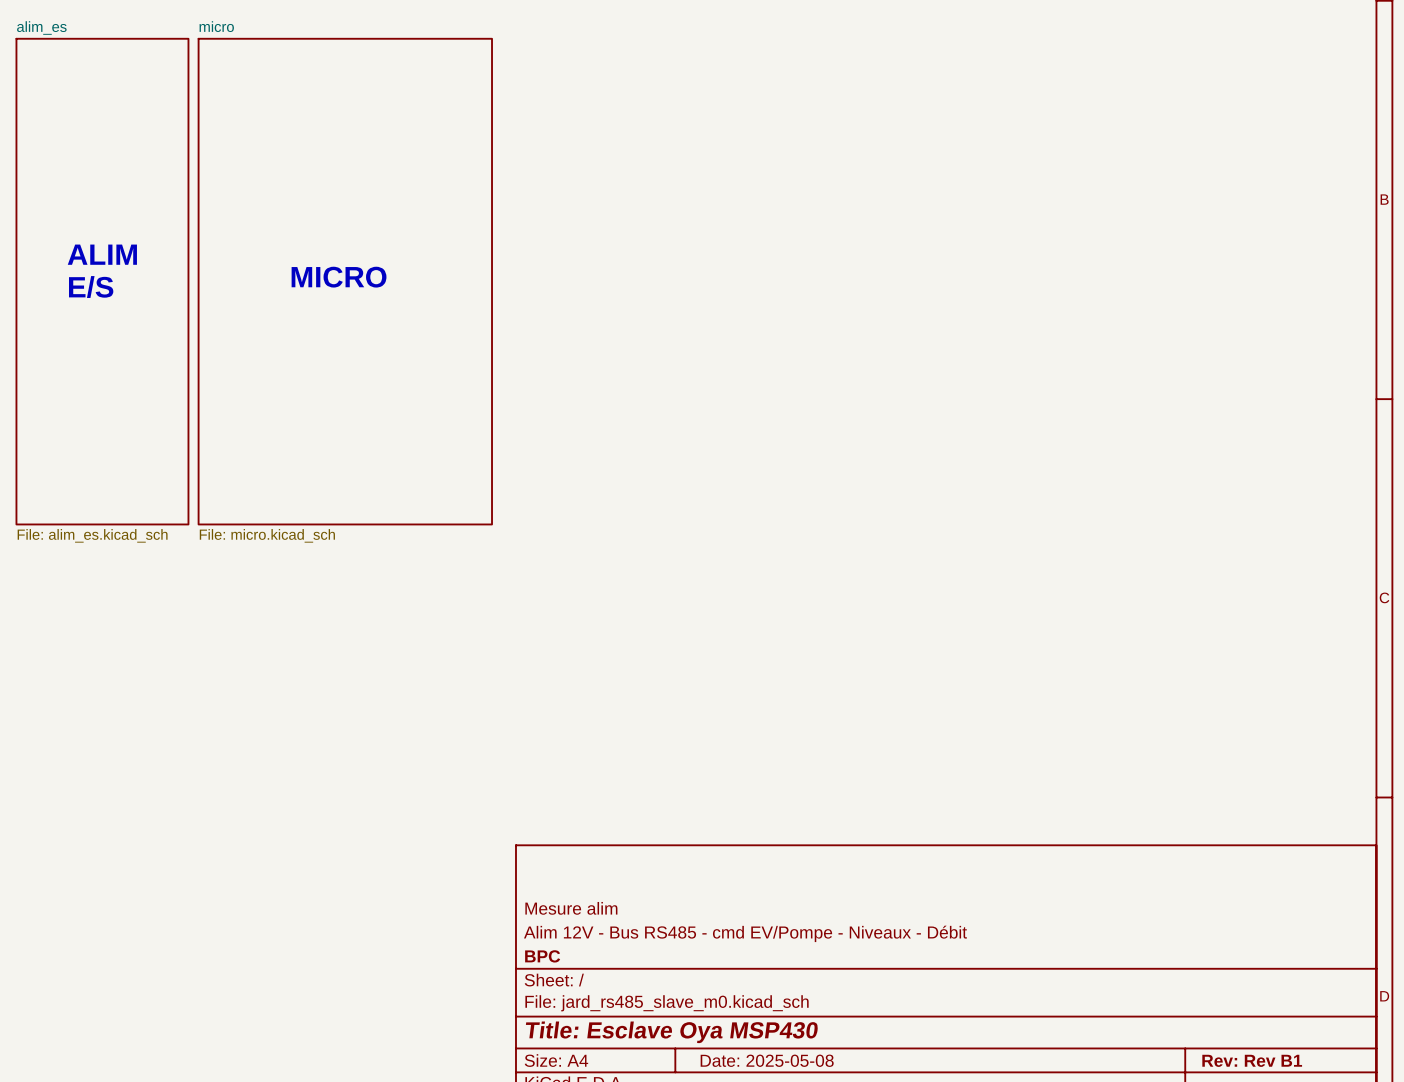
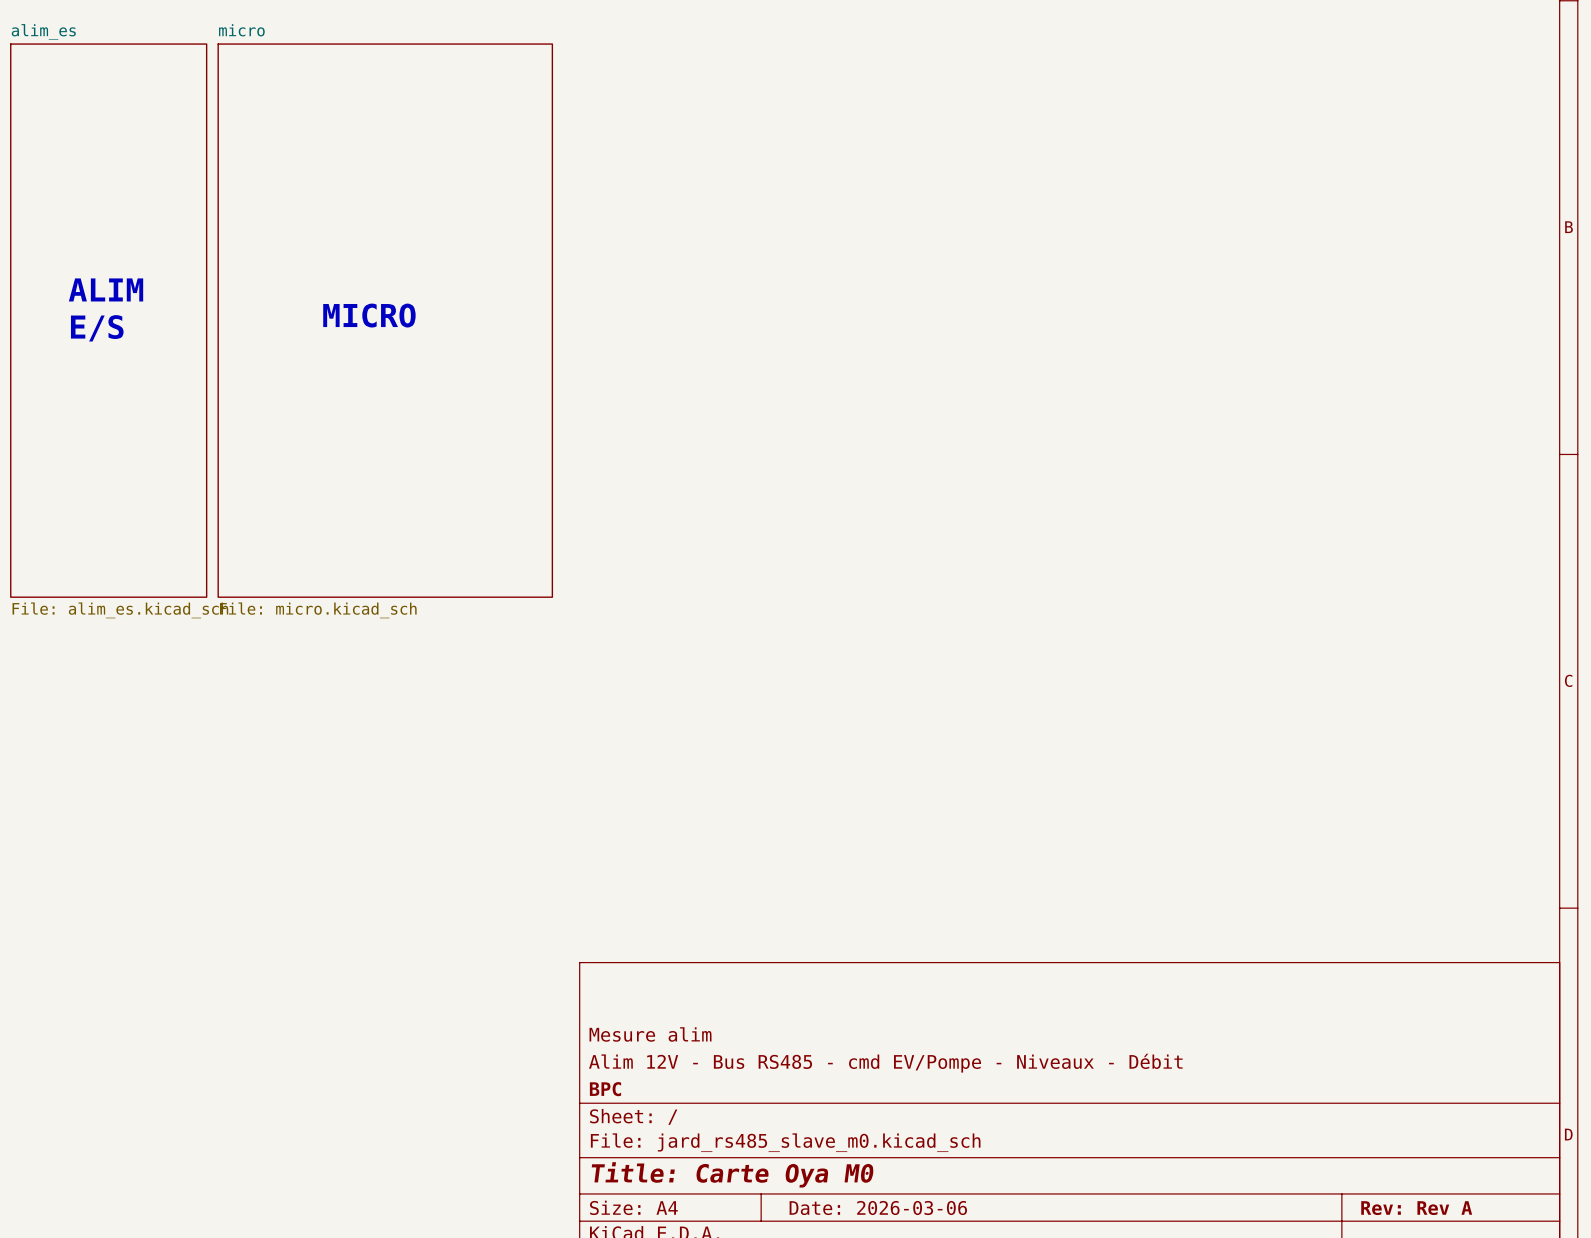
title block: Title: Esclave Oya MSP430 (671, 1032) -> Title: Carte Oya M0 (732, 1174)
title block: Date: 2025-05-08 (767, 1060) -> Date: 2026-03-06 (878, 1207)
title block: Rev: Rev B1 (1252, 1060) -> Rev: Rev A (1416, 1208)

